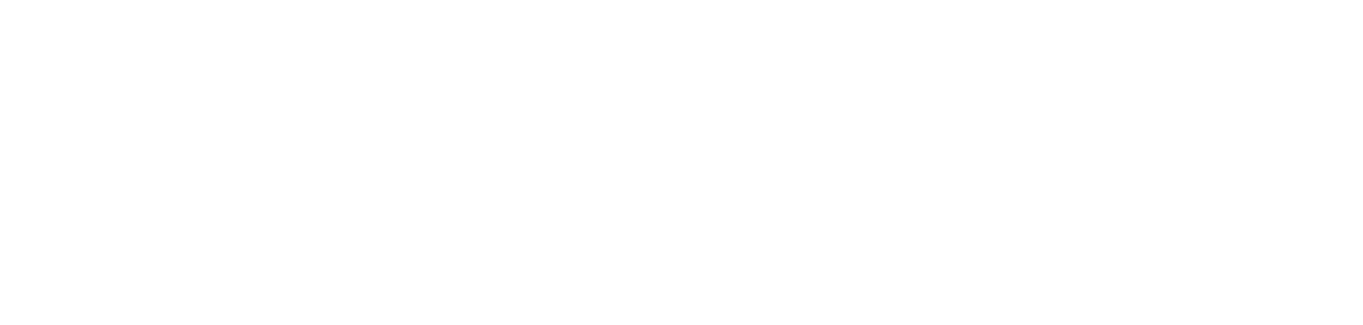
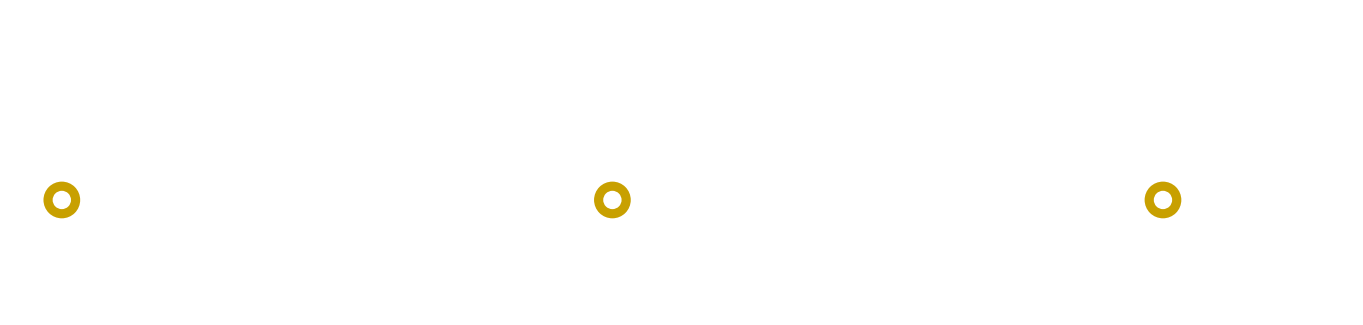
part: none -> (61, 199)
part: none -> (612, 199)
part: none -> (1162, 199)

